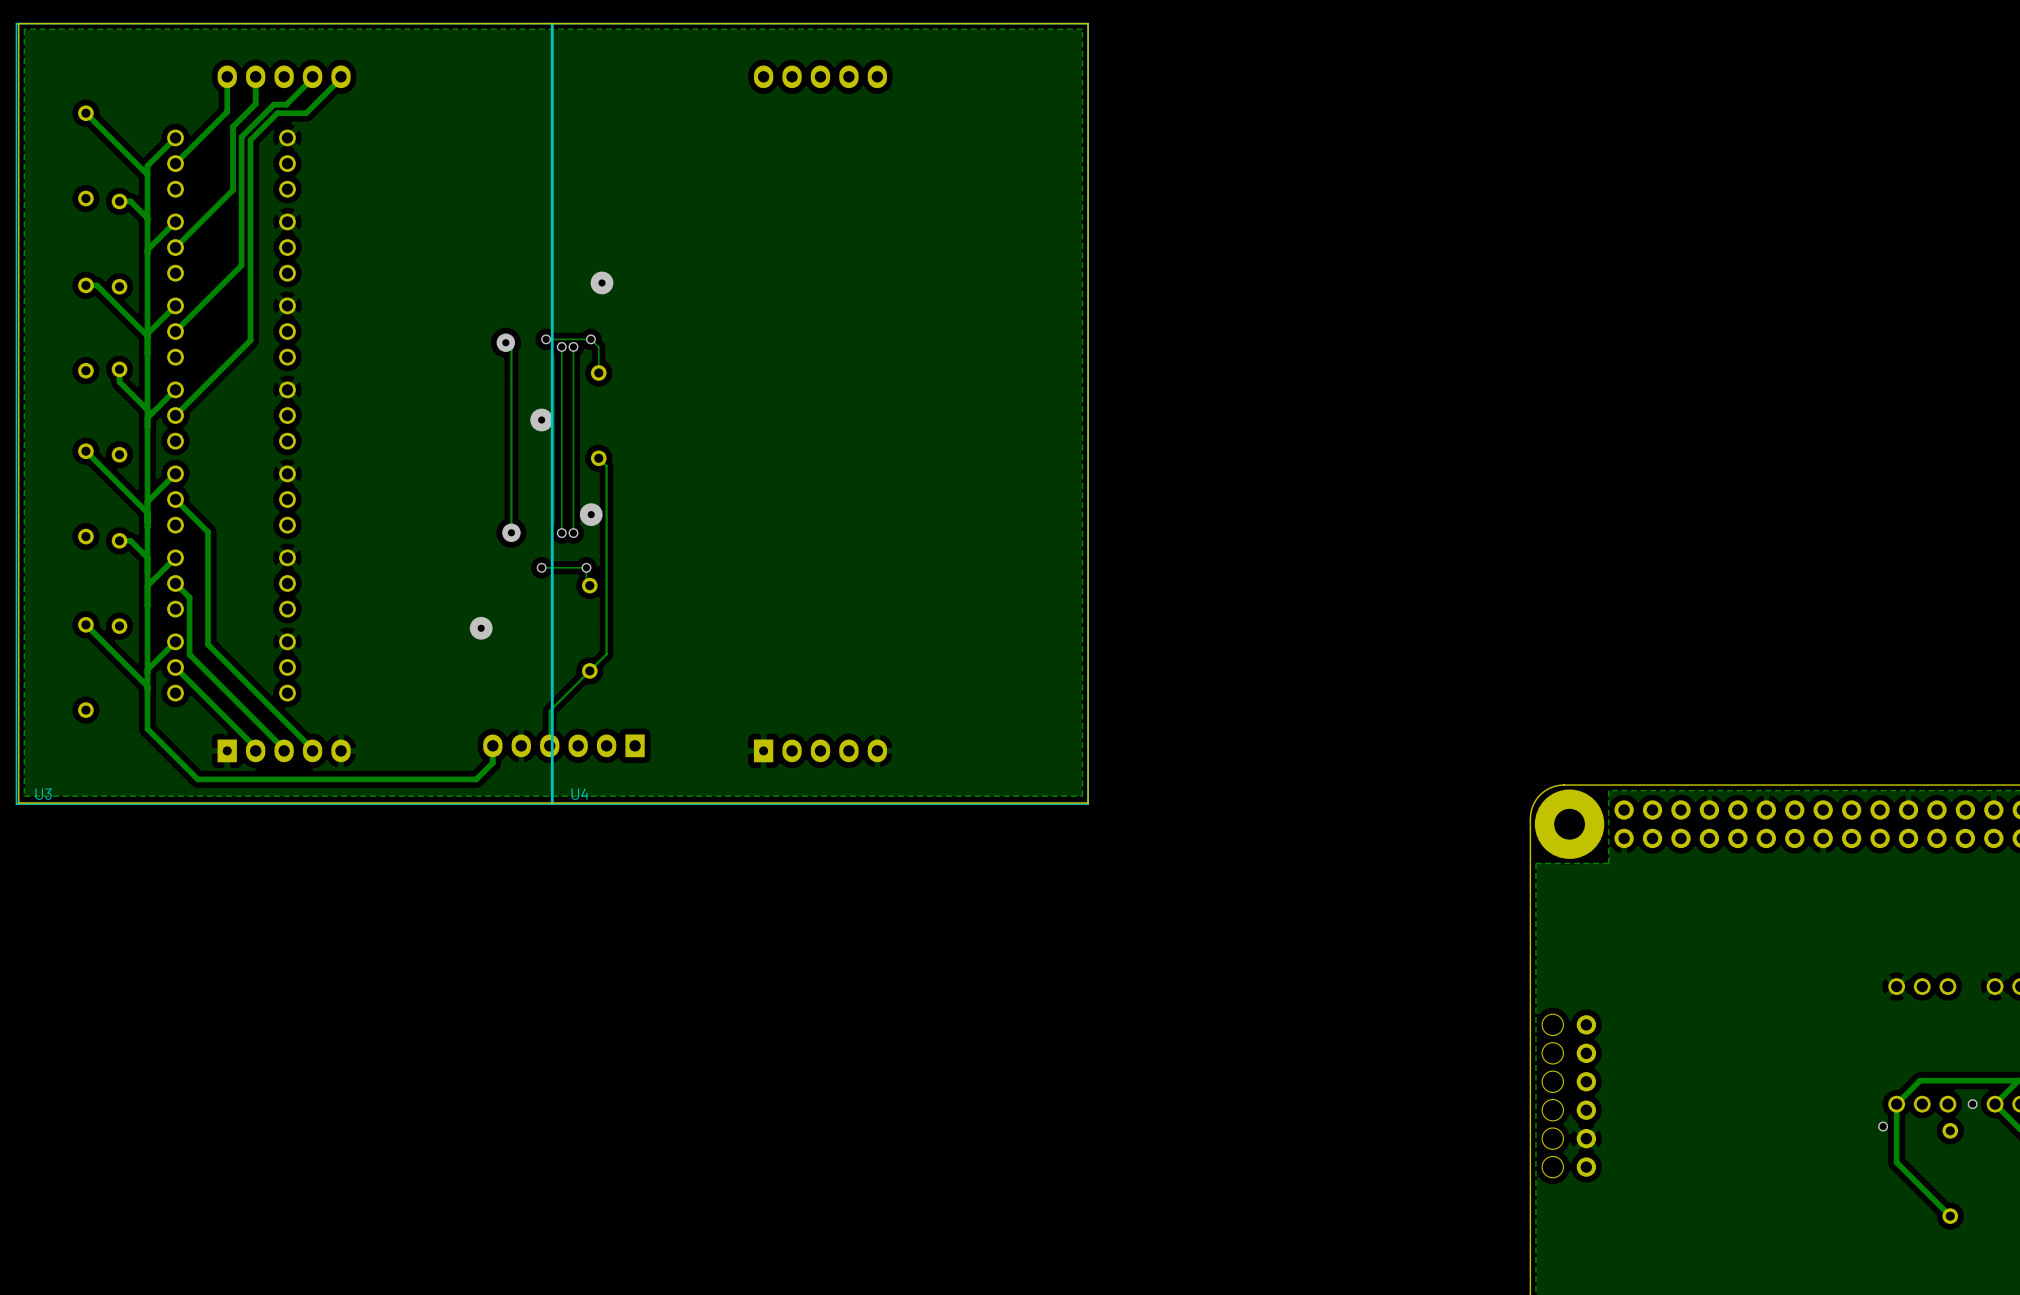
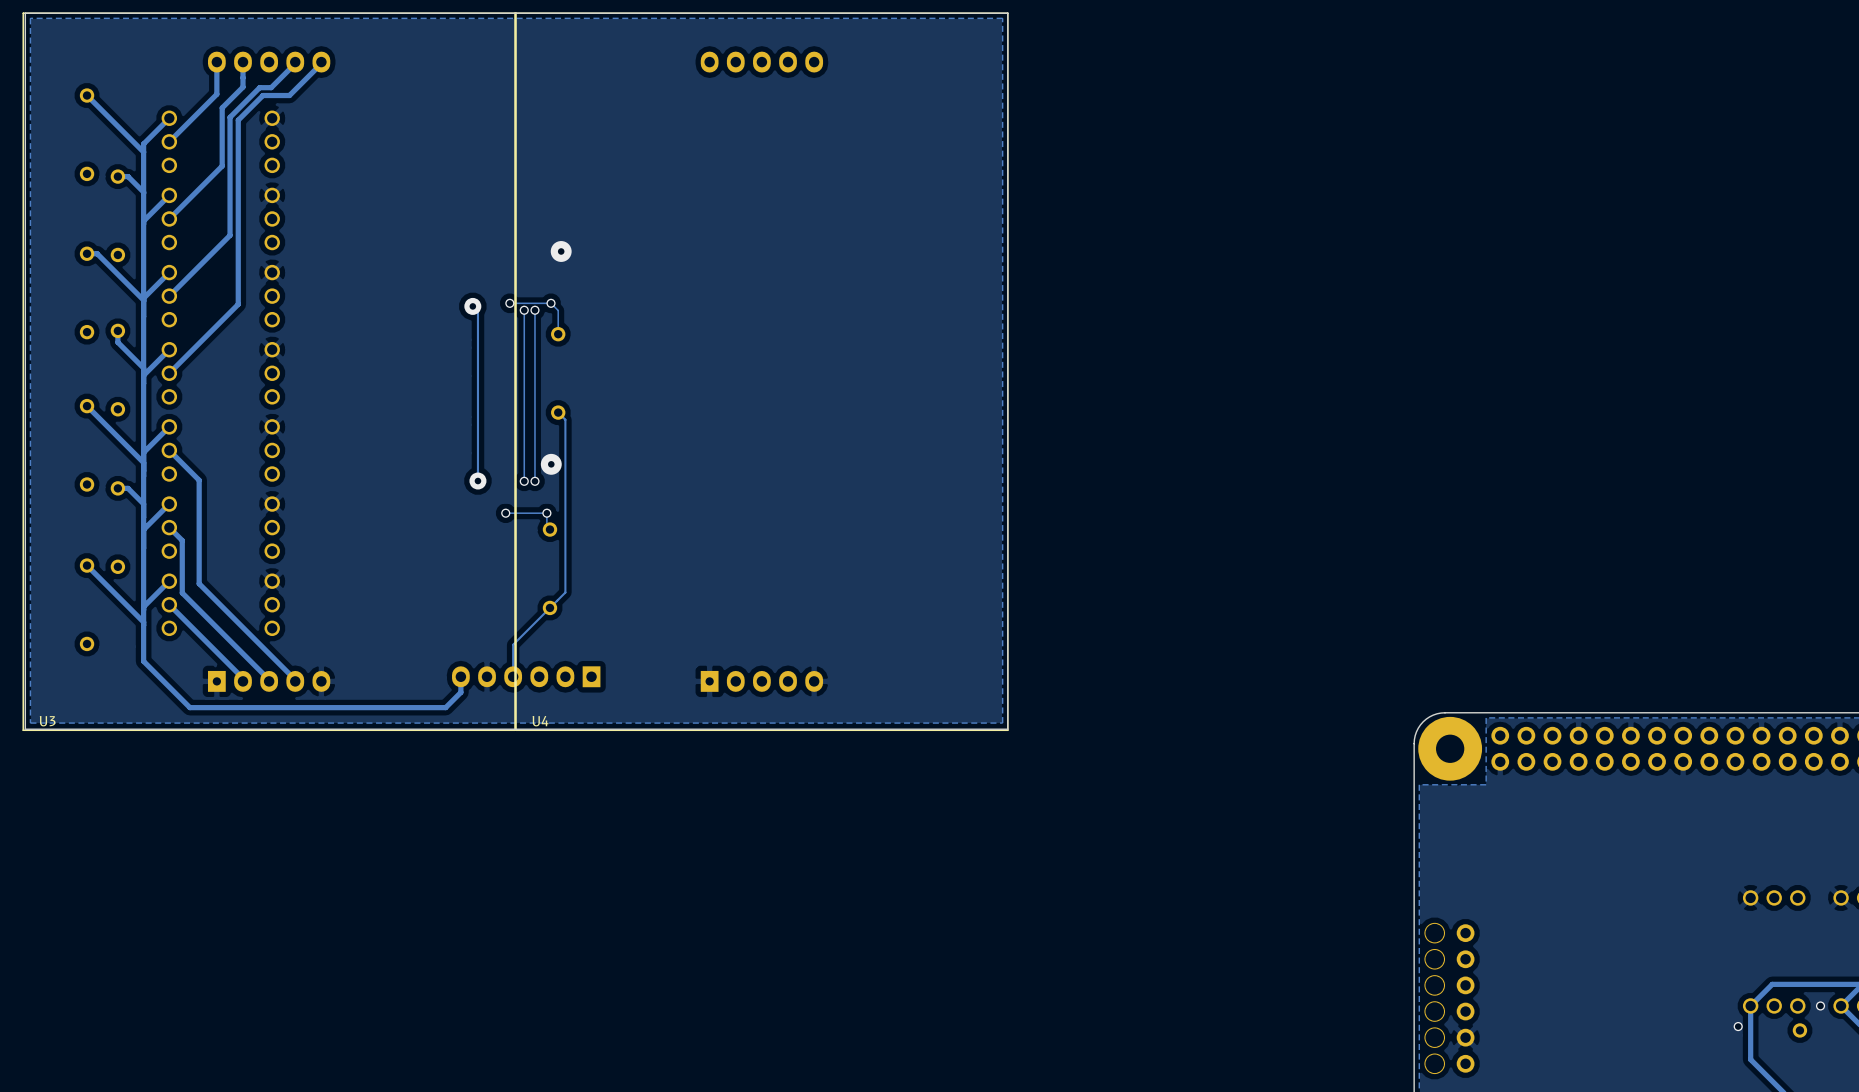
via: (541, 420) -> none
via: (481, 628) -> none

